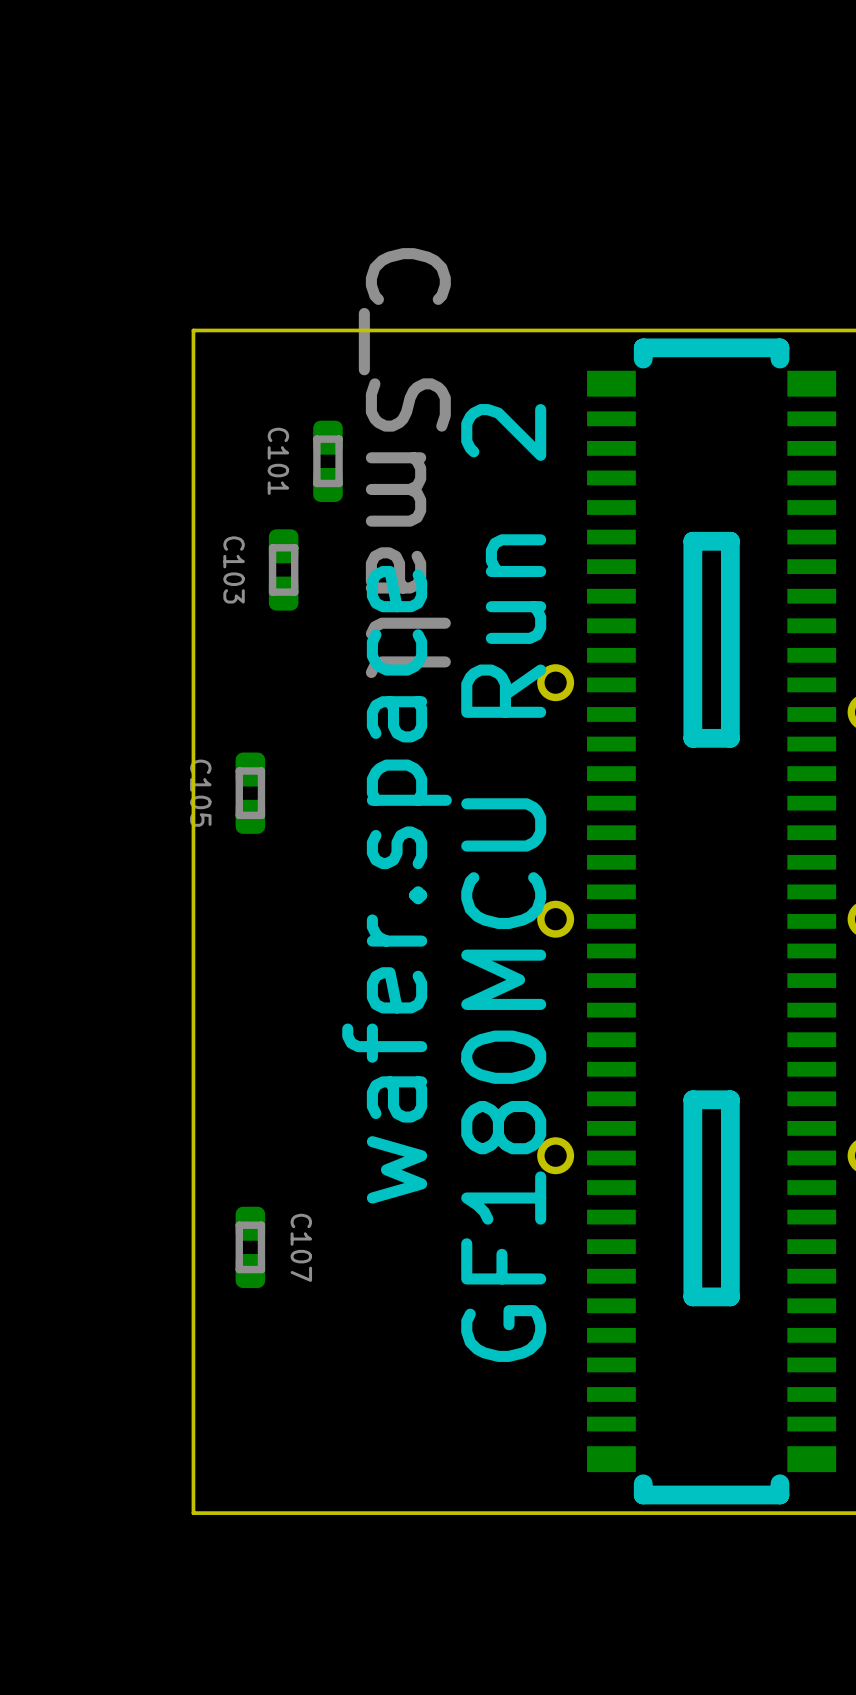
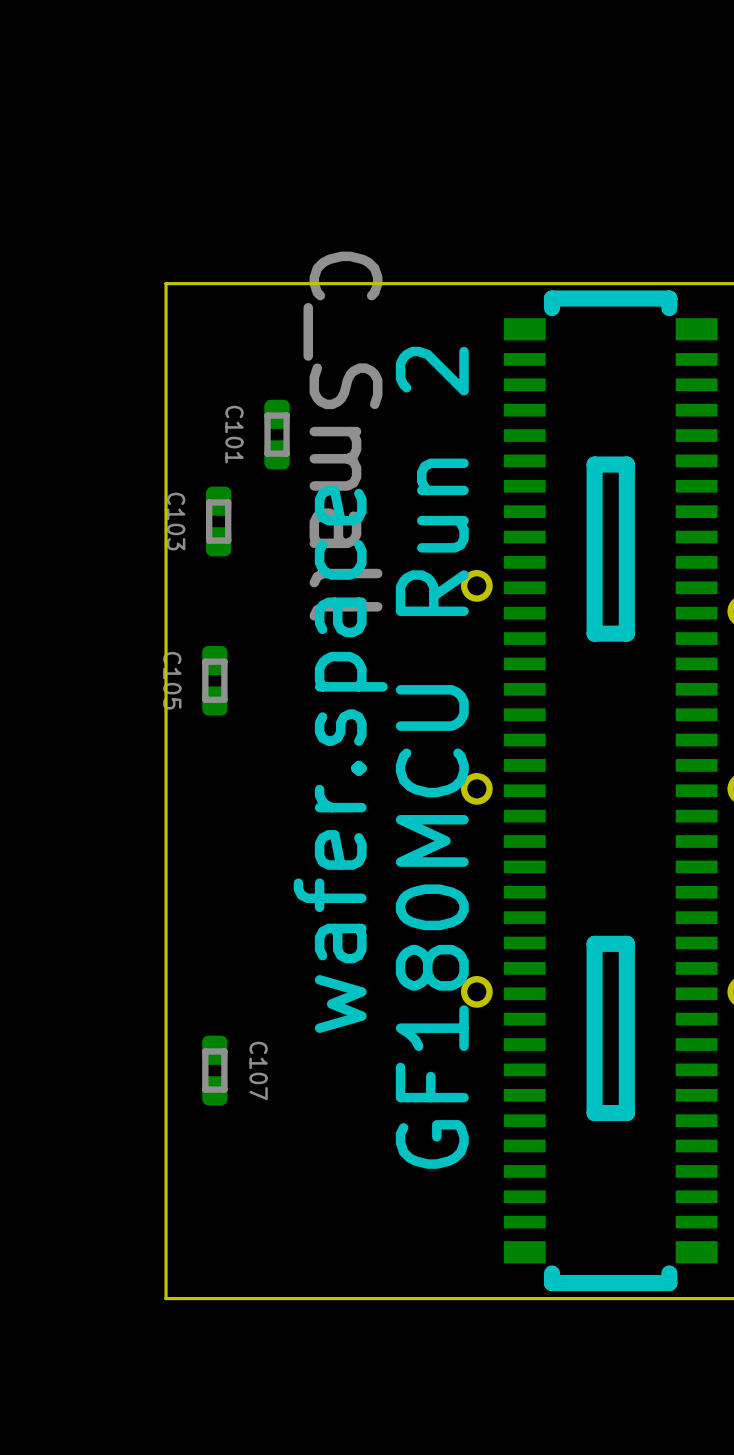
C101 position: (327, 461) -> (277, 434)
C103 position: (283, 569) -> (218, 521)

